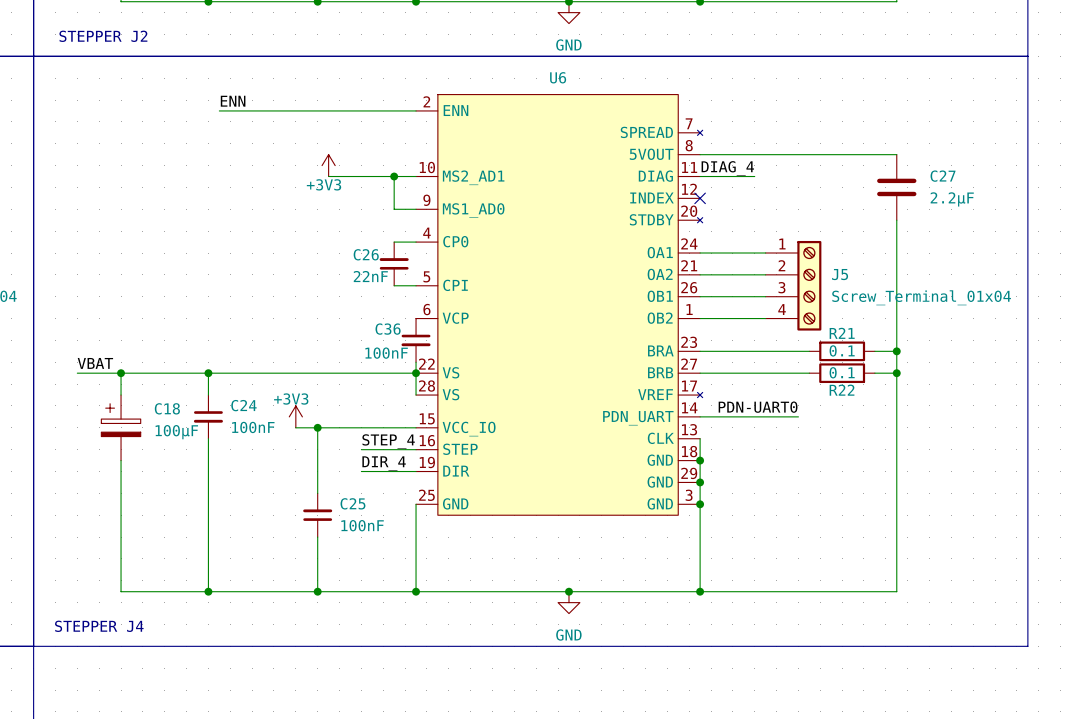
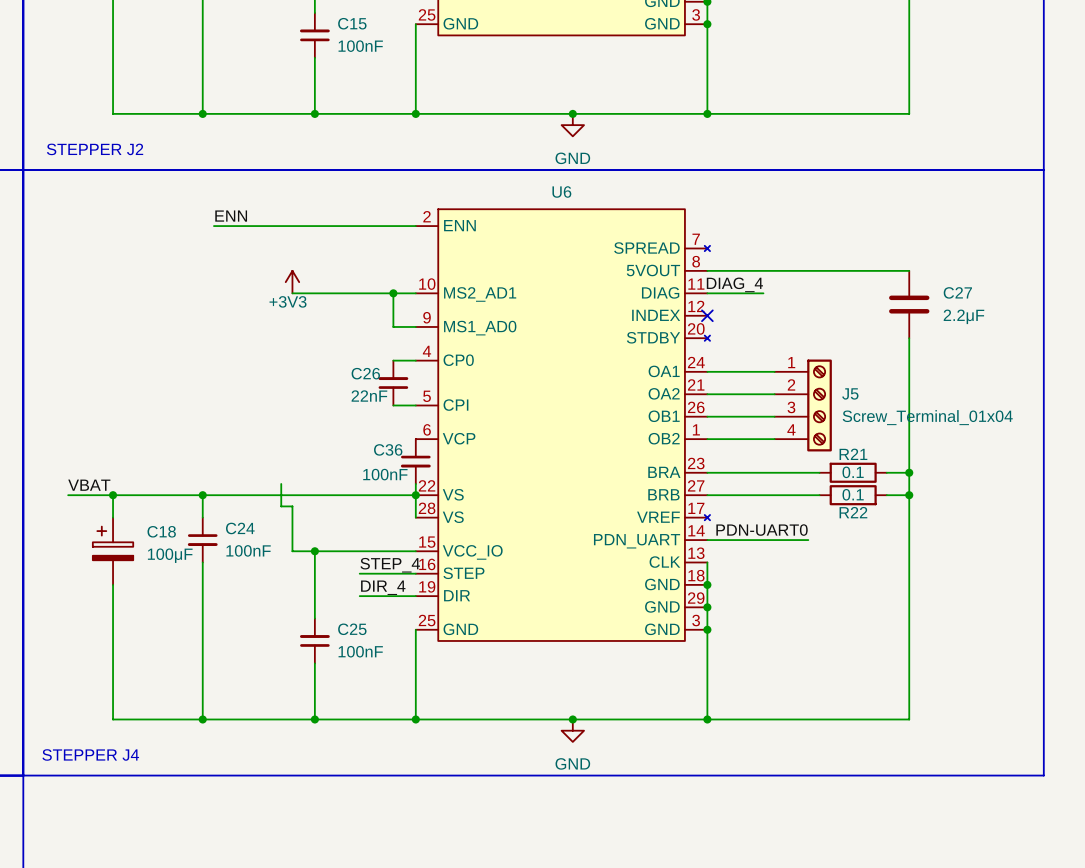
power symbol position: +3V3 (328, 165) -> +3V3 (292, 282)
wire: none -> (292, 293) (326, 293)
wire: none -> (281, 483) (281, 506) (292, 506) (292, 551)
power symbol: +3V3 (295, 416) -> none

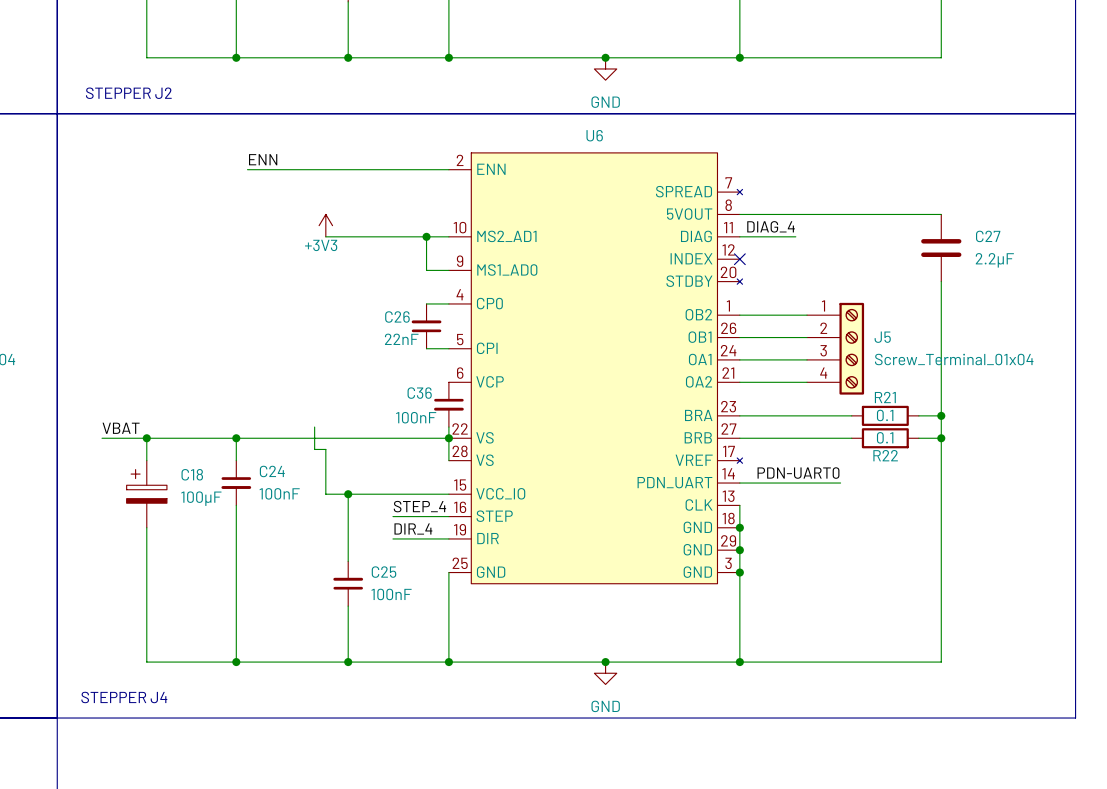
U6 pin number: 24 (696, 362) -> 1 (728, 305)
U6 pin name: OA1 (664, 371) -> OB2 (698, 314)
U6 pin number: 21 (696, 384) -> 26 (728, 328)
U6 pin name: OA2 (664, 393) -> OB1 (700, 337)
U6 pin number: 26 (696, 407) -> 24 (728, 350)
U6 pin name: OB1 (664, 416) -> OA1 (700, 359)
U6 pin number: 1 (696, 429) -> 21 (728, 373)
U6 pin name: OB2 (664, 438) -> OA2 (699, 381)

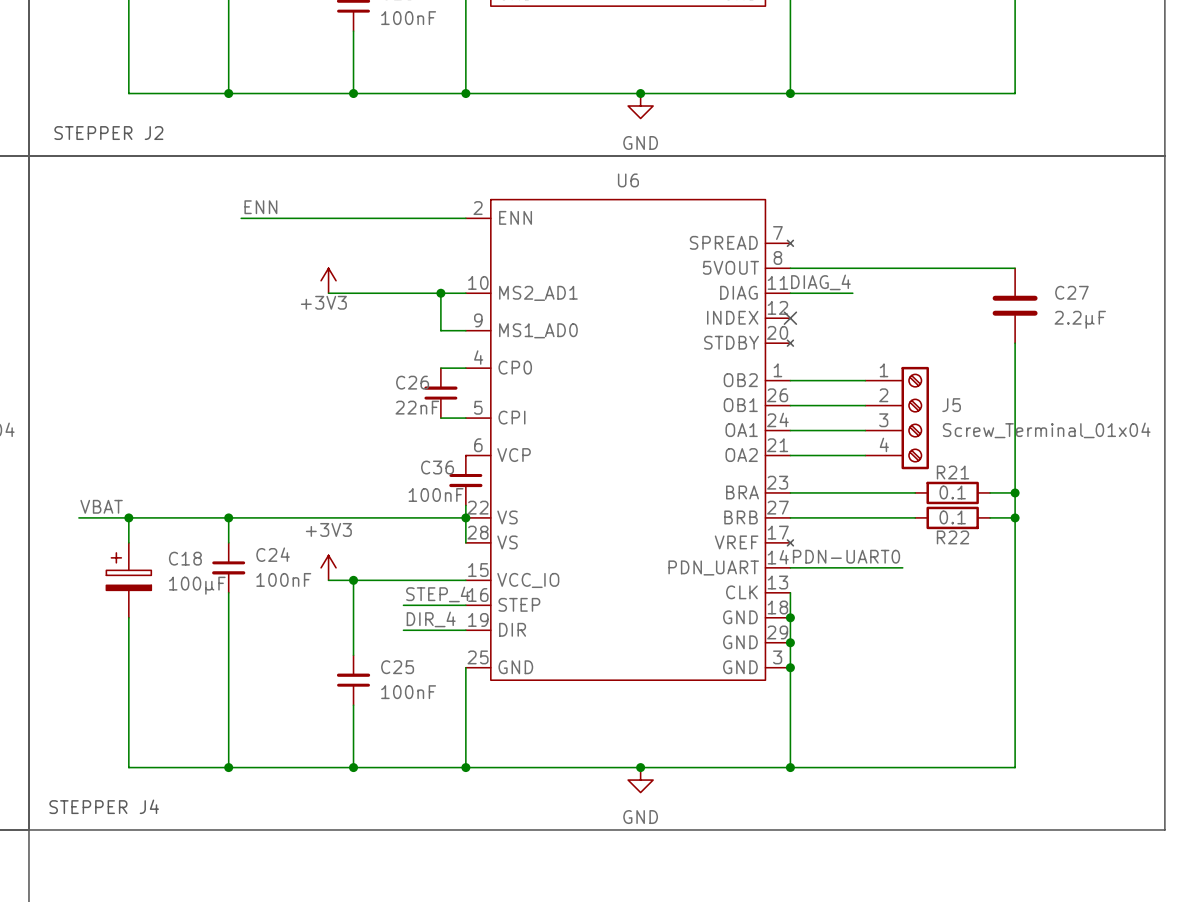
wire: (314, 427) (314, 449) (325, 449) (325, 494) -> none
power symbol: none -> +3V3 (328, 567)

